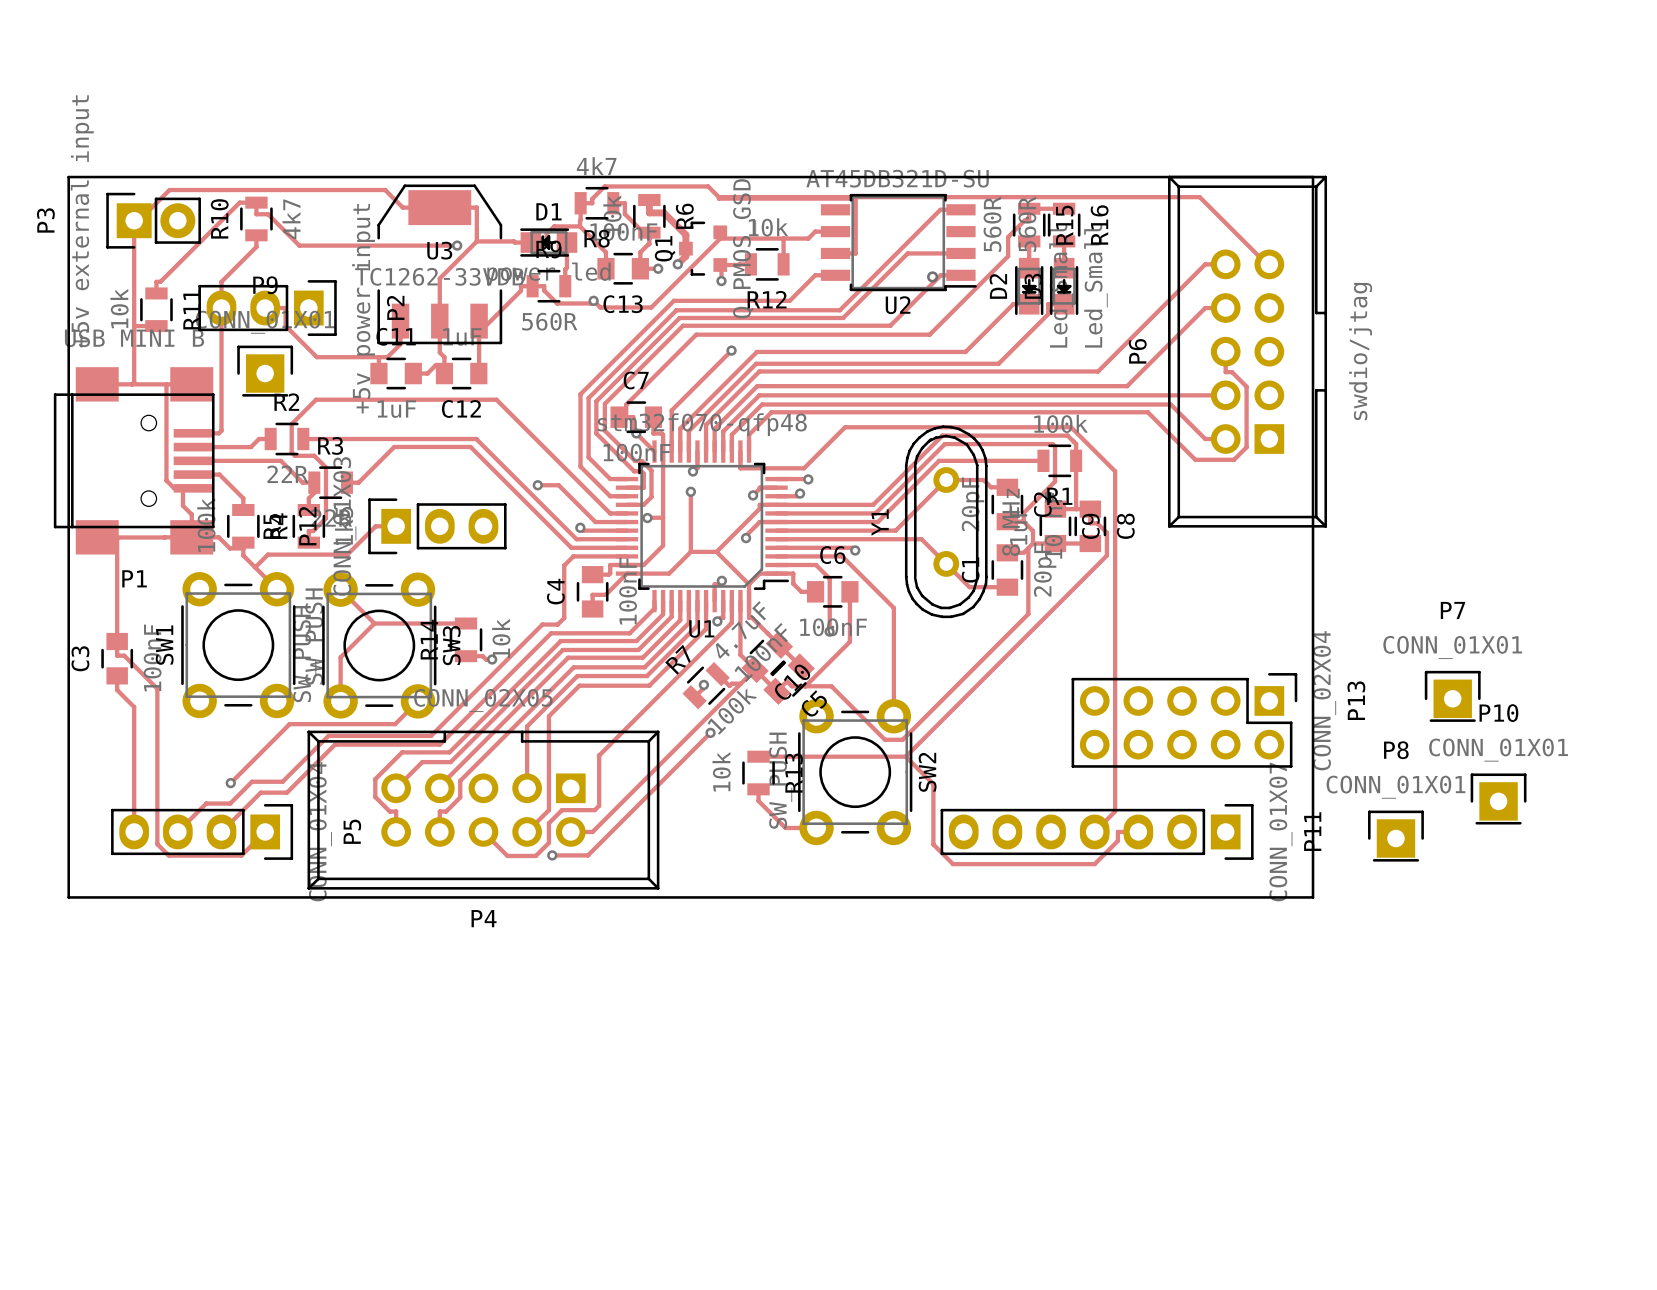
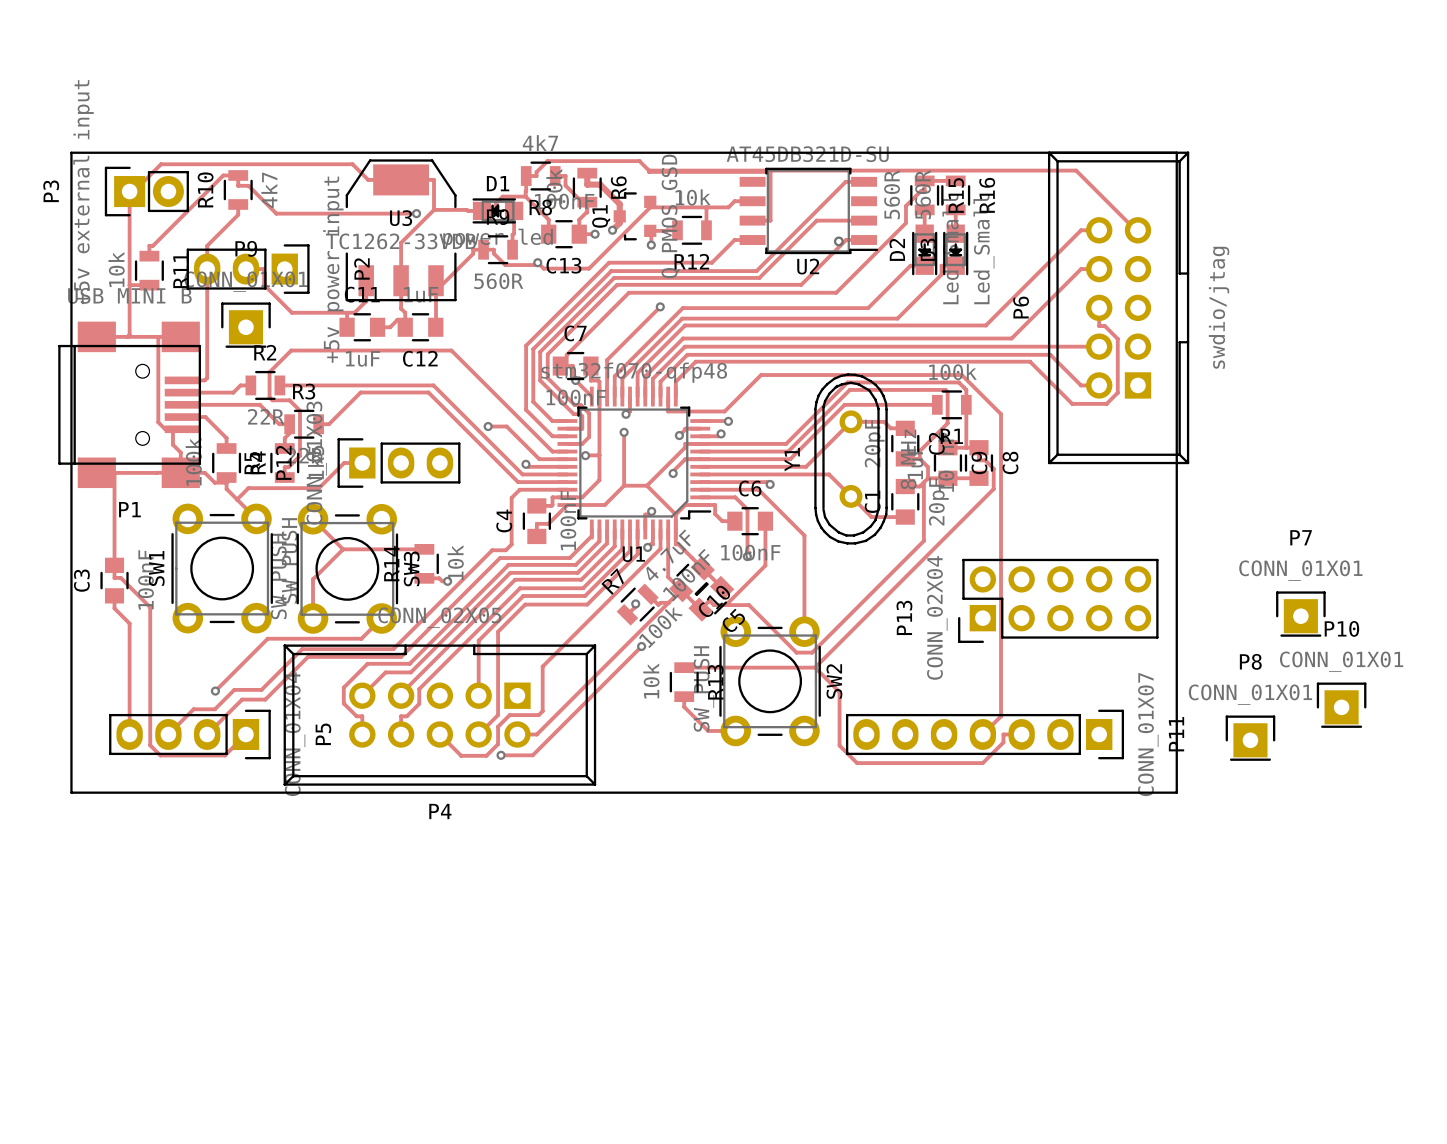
P13 rotation: 0° (1184, 720) -> 180° (1058, 600)

